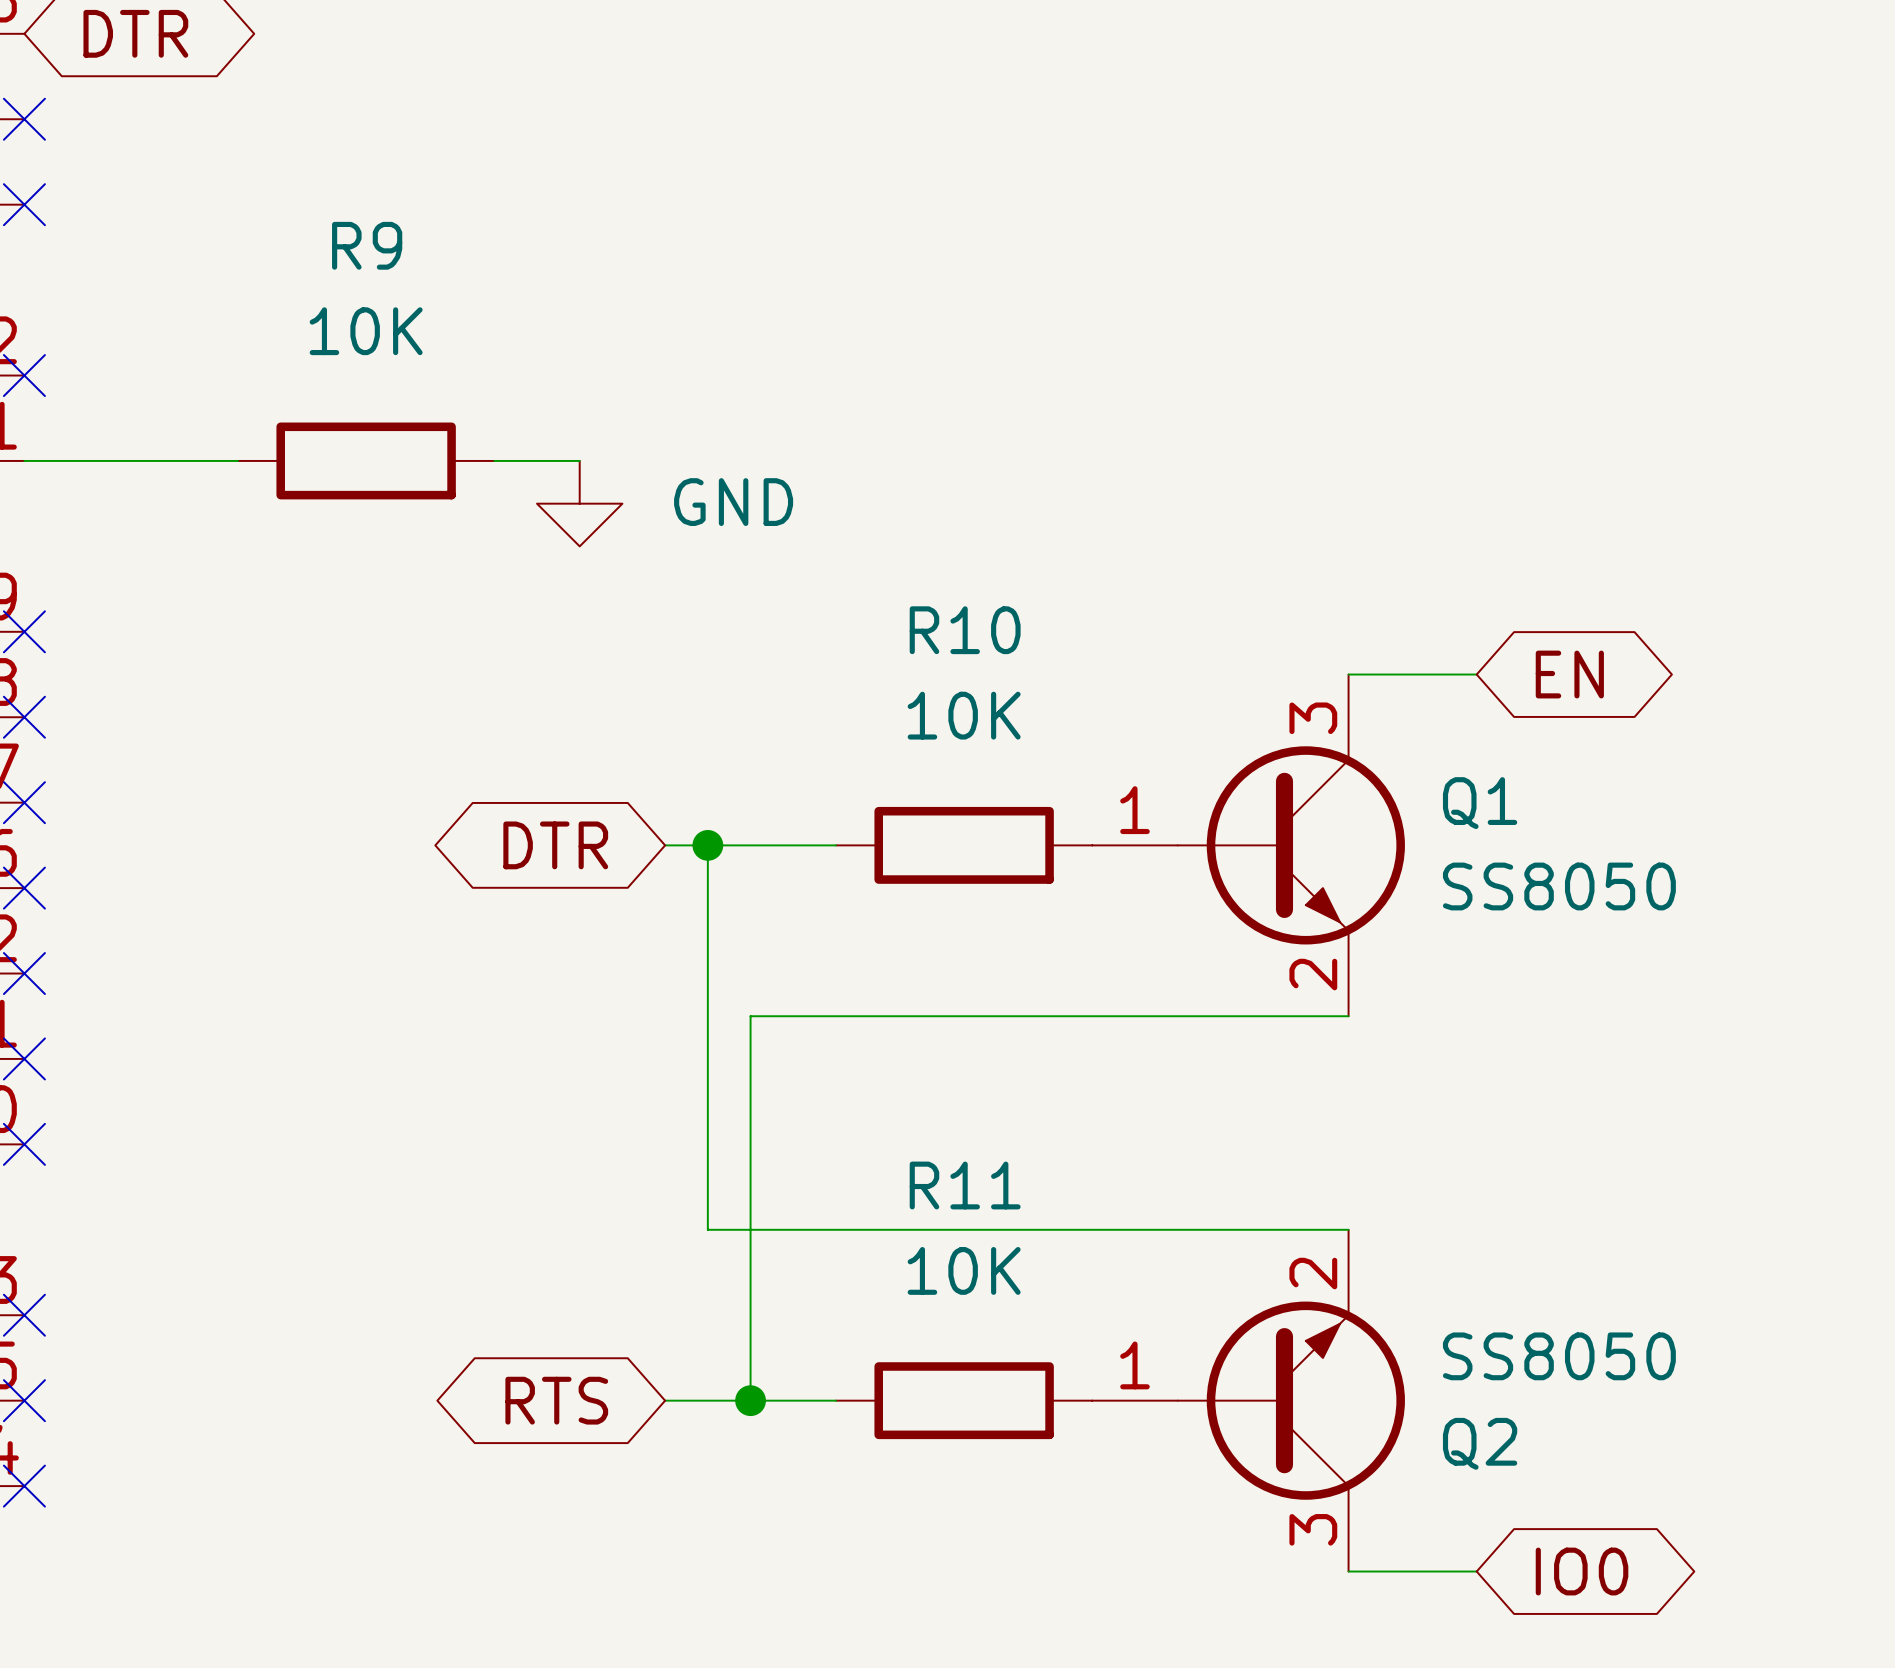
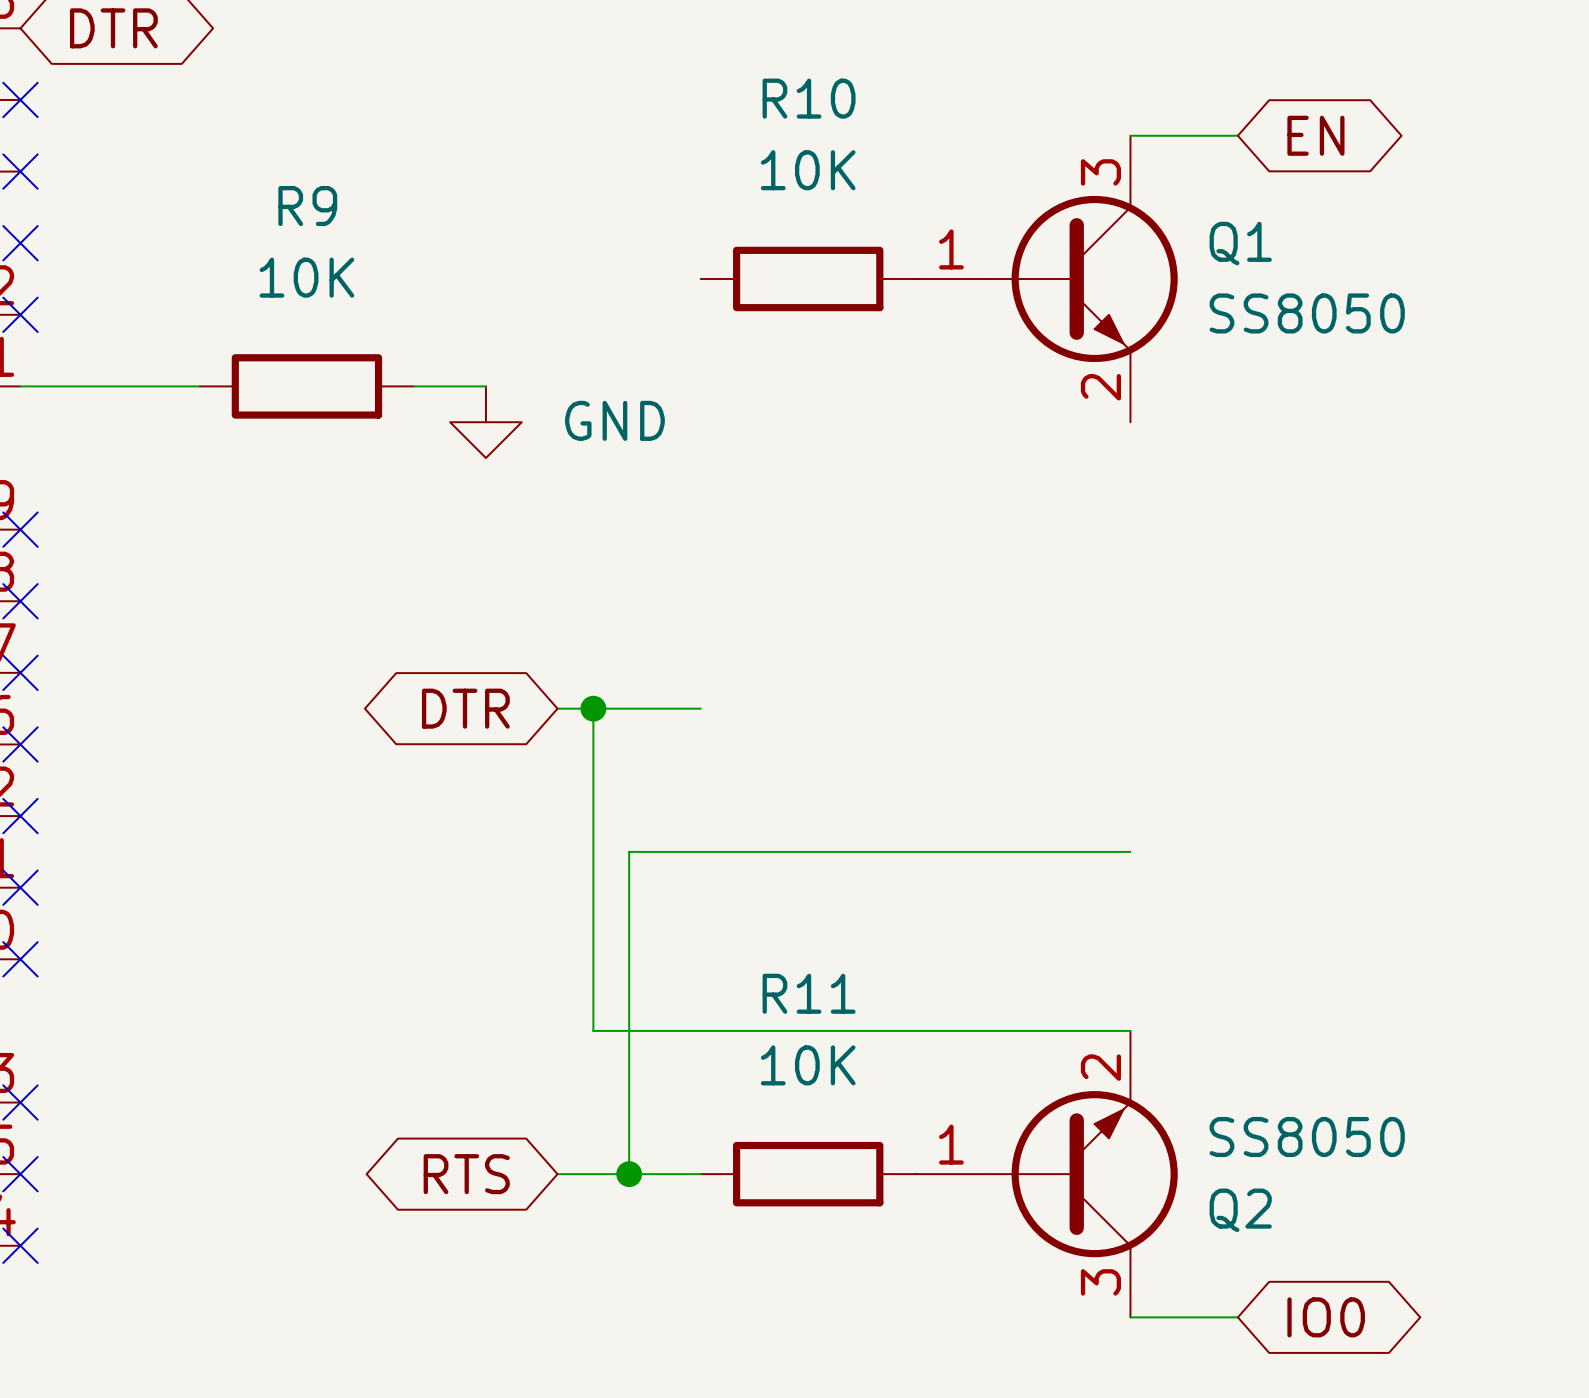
no-connect mark: none -> (20, 243)
wire: (1348, 674) (1476, 674) -> (1130, 135) (1237, 135)
global label position: EN (1569, 674) -> EN (1315, 135)
R10 position: (964, 845) -> (808, 278)
Q1 position: (1248, 845) -> (1046, 278)

